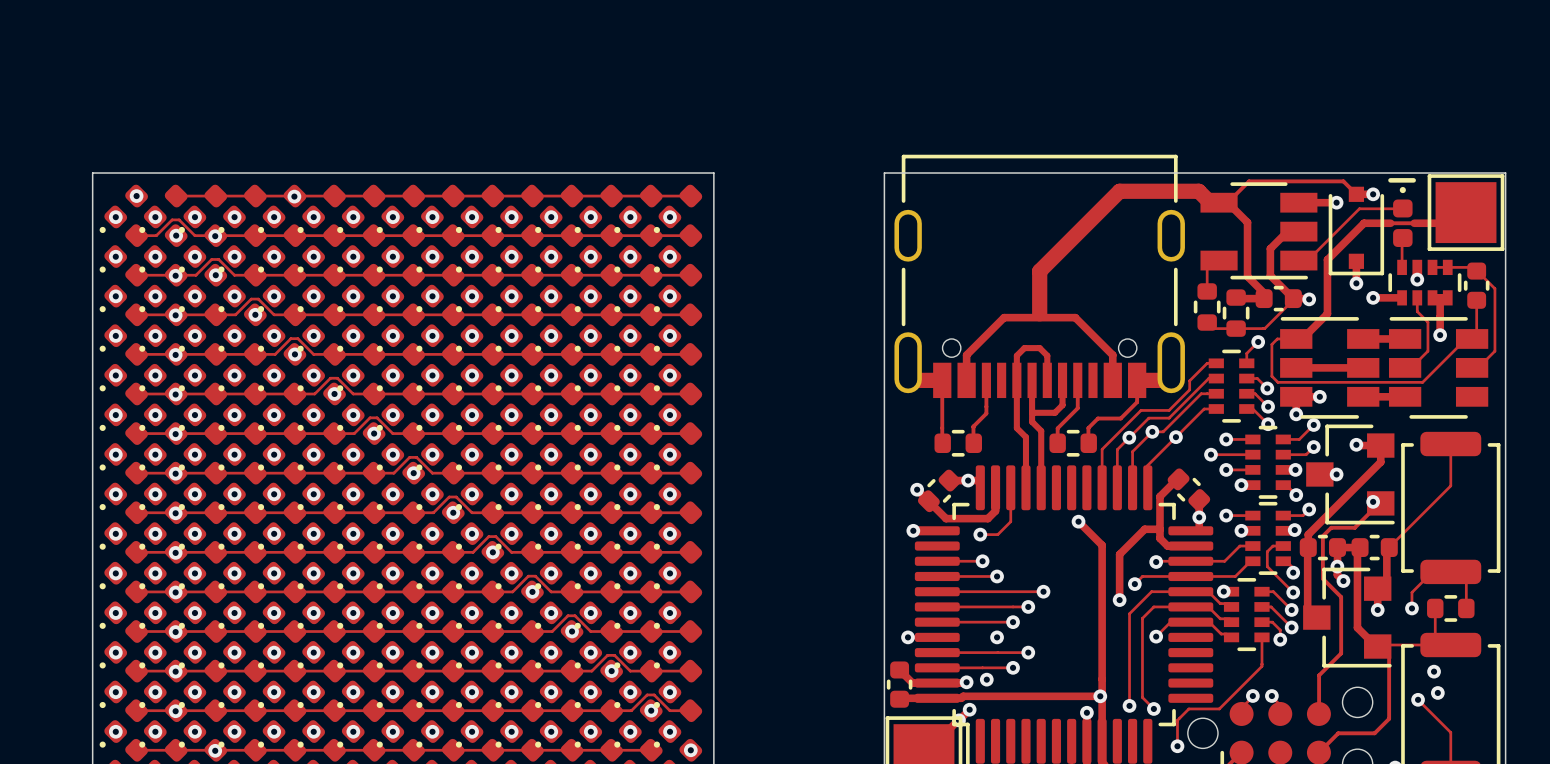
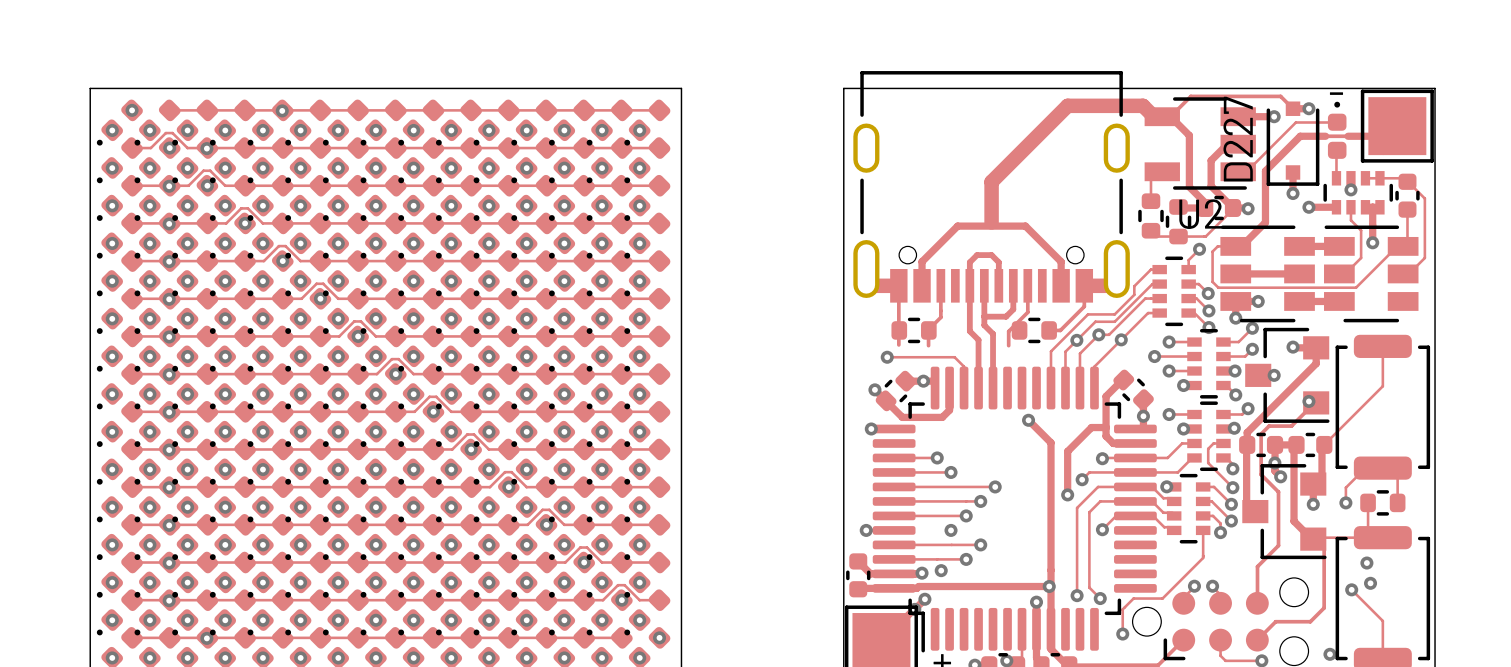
D227 name: none -> D227 (1238, 139)
U2 name: none -> U2 (1200, 214)
track: (1120, 418) (1097, 418) (1088, 428) (1088, 443) -> (1068, 322) (1060, 330) (1048, 330)
part position: (958, 443) -> (914, 330)
part position: (1073, 443) -> (1034, 330)
track: (1010, 487) (1010, 521) (997, 534) (980, 534) -> (964, 388) (964, 366) (954, 357) (887, 357)
via position: (980, 534) -> (887, 357)

